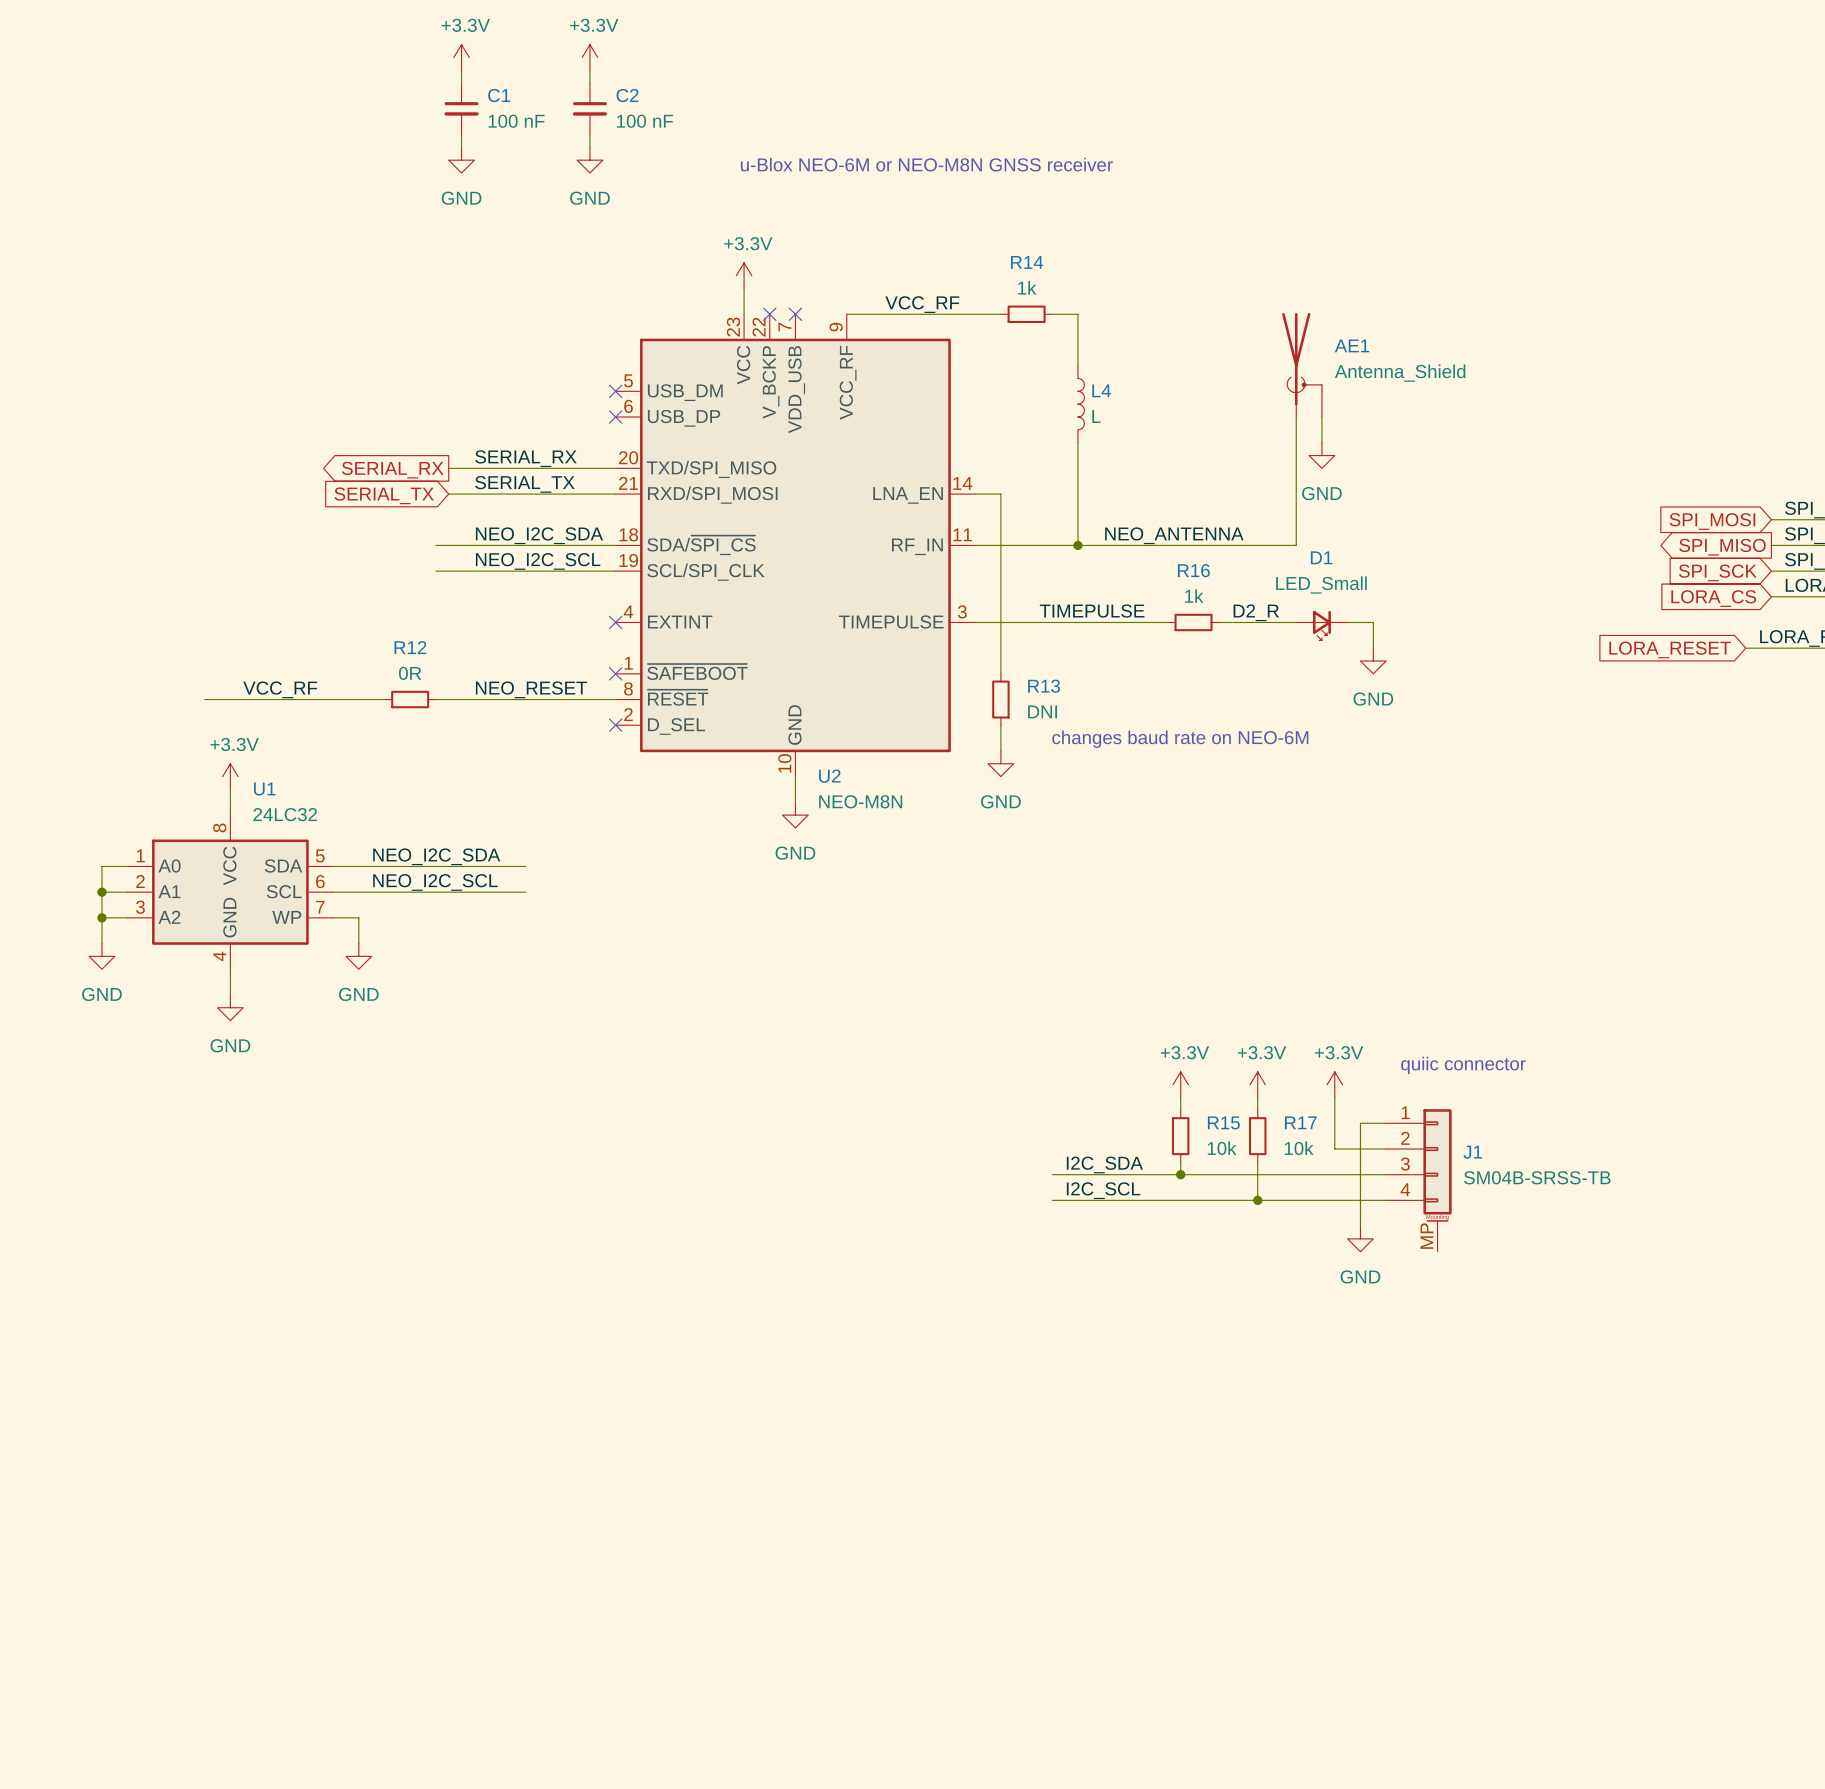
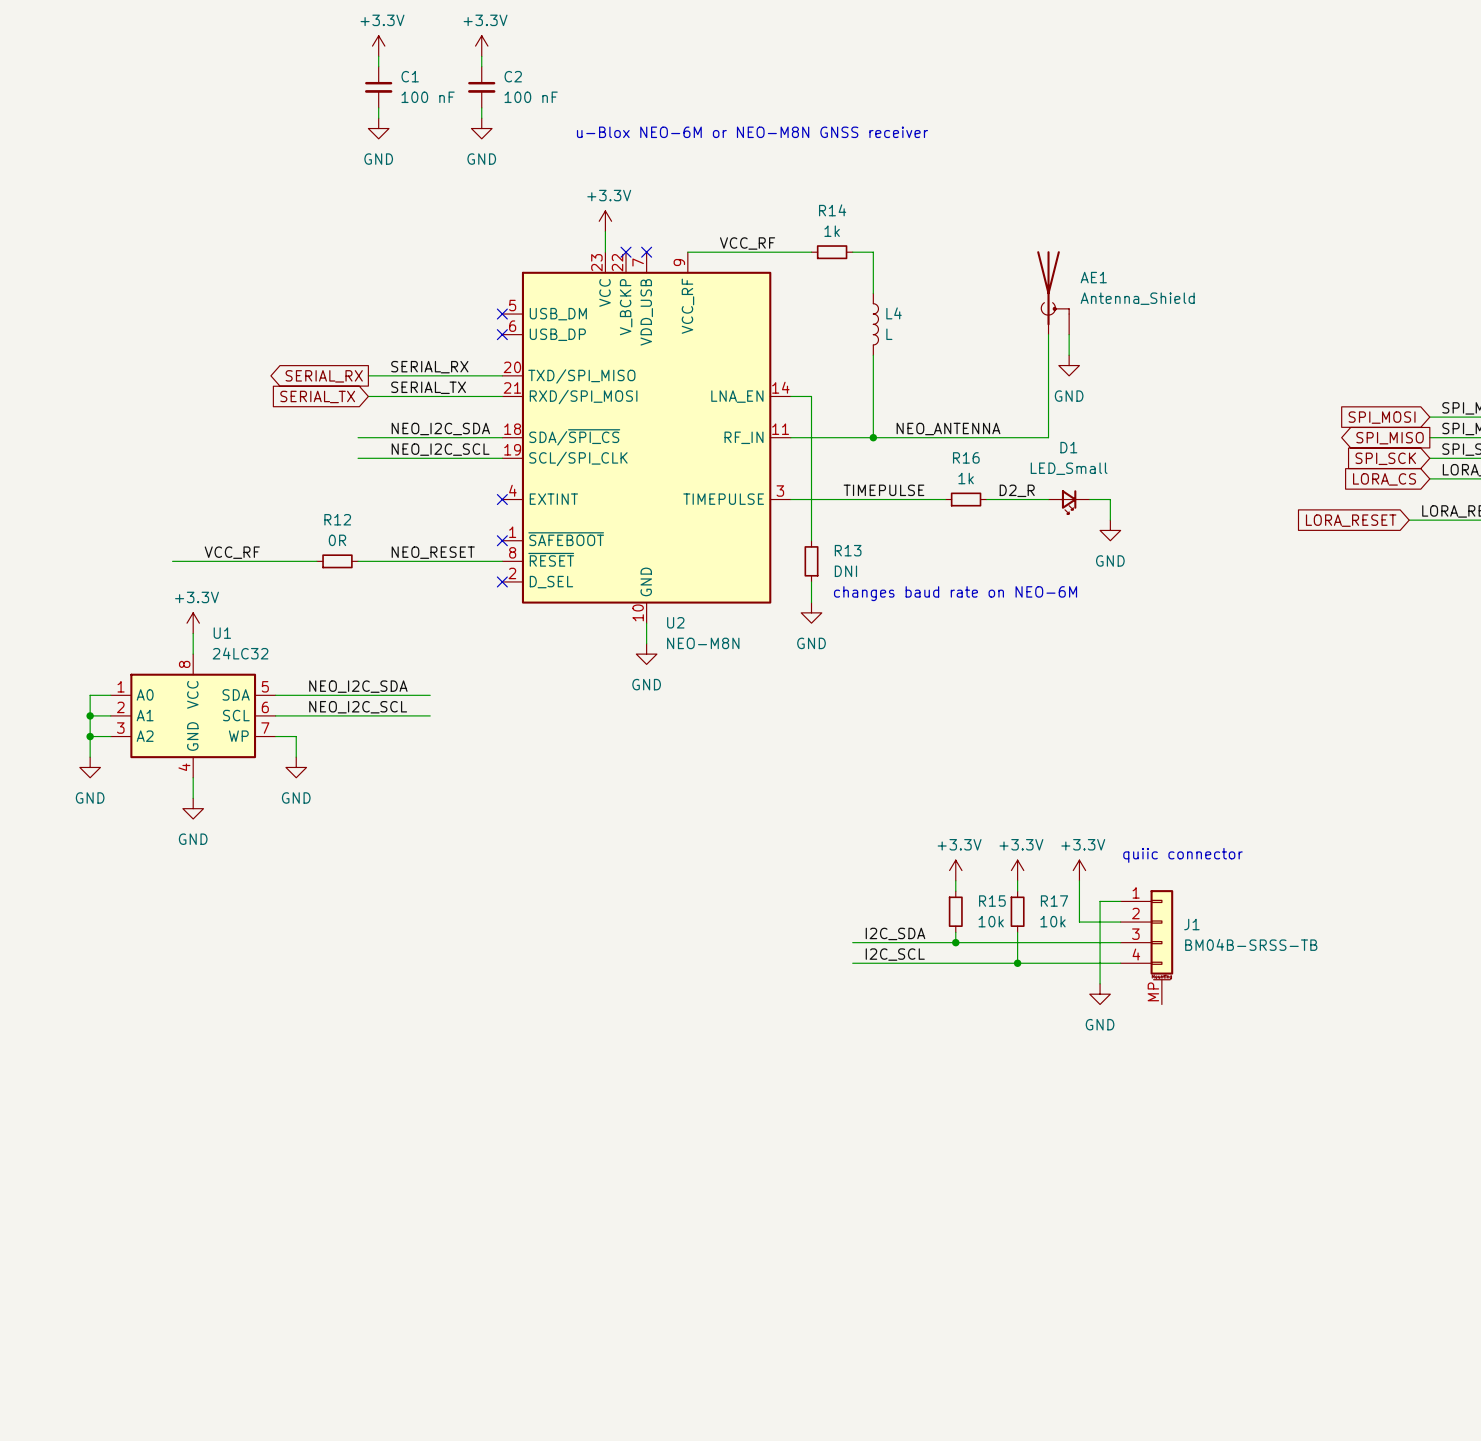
J1 value: SM04B-SRSS-TB (1537, 1177) -> BM04B-SRSS-TB (1251, 944)

